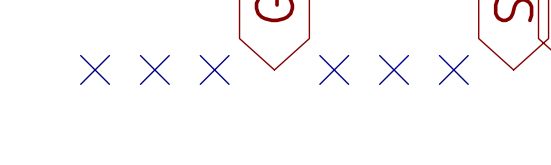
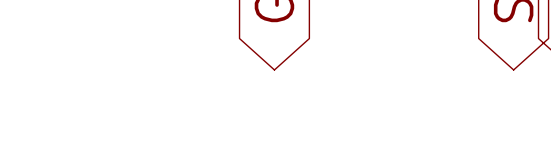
no-connect mark: (95, 69) -> none
no-connect mark: (154, 69) -> none
no-connect mark: (214, 69) -> none
no-connect mark: (334, 69) -> none
no-connect mark: (394, 69) -> none
no-connect mark: (453, 69) -> none

